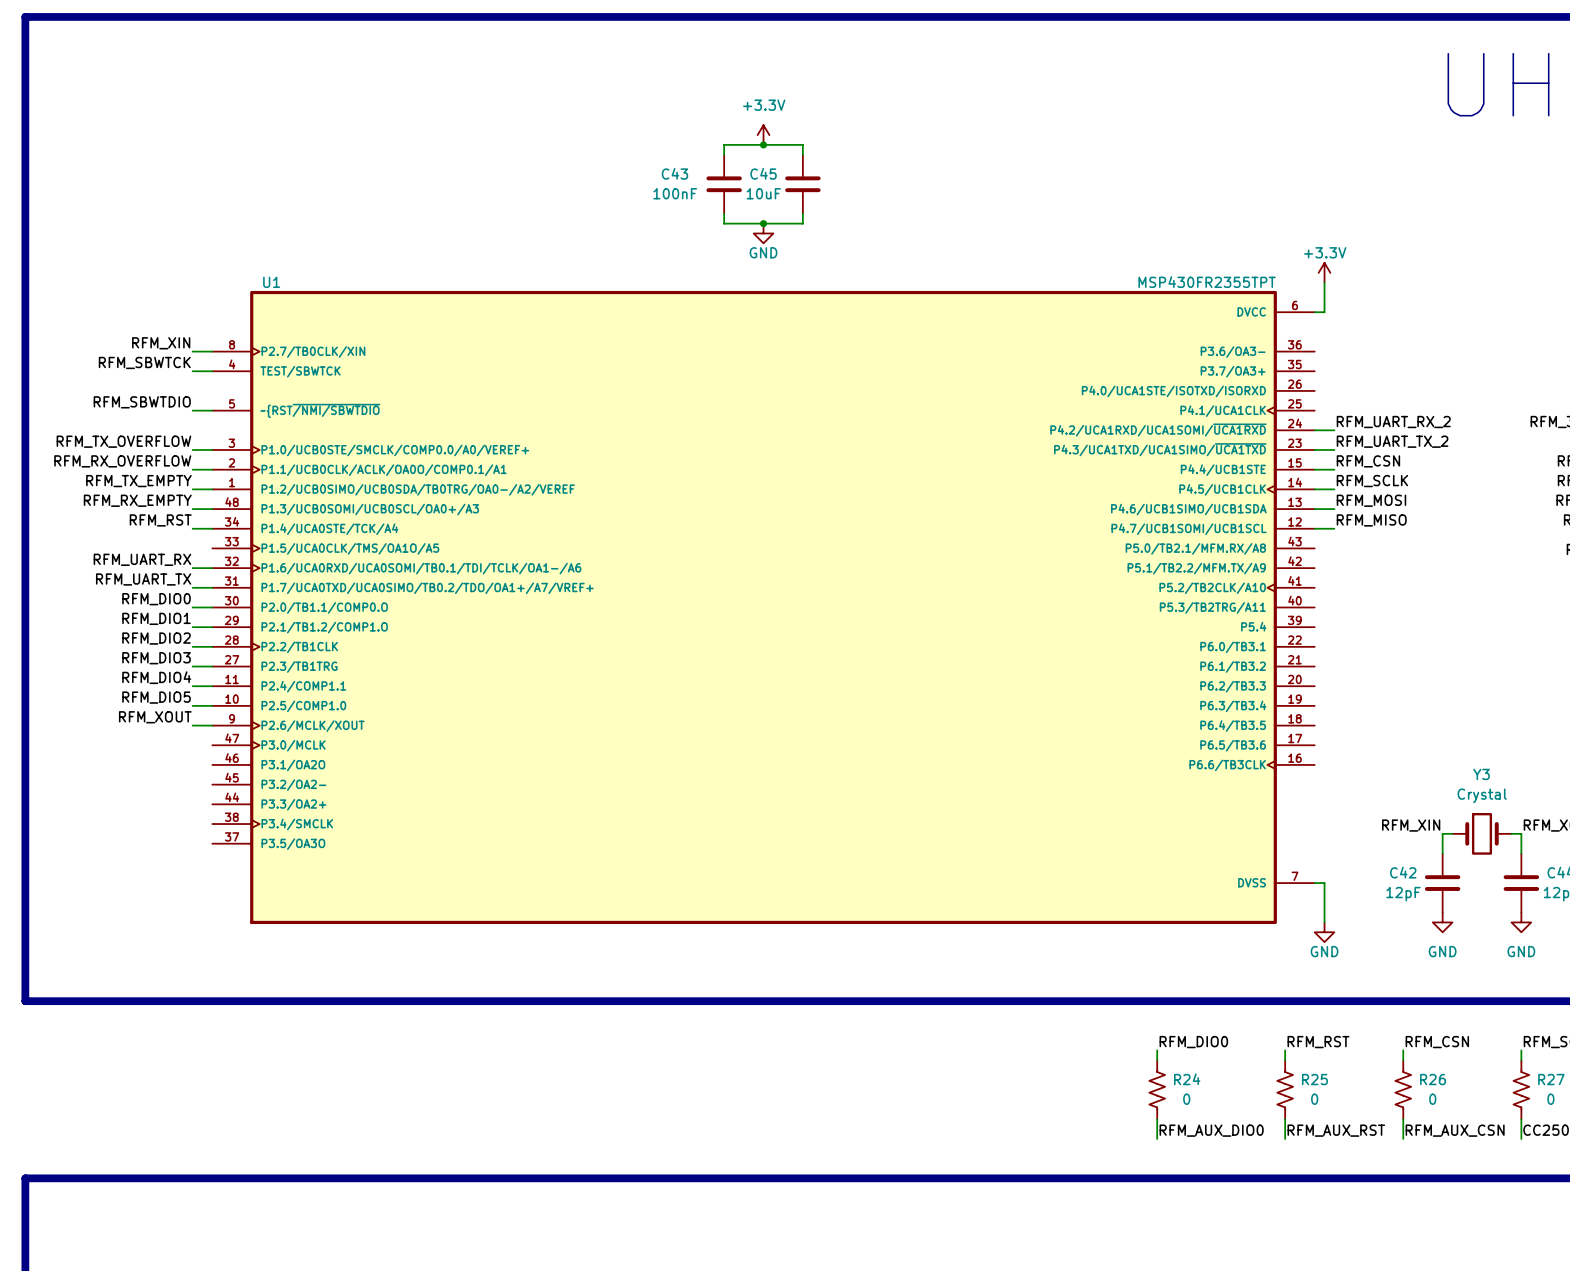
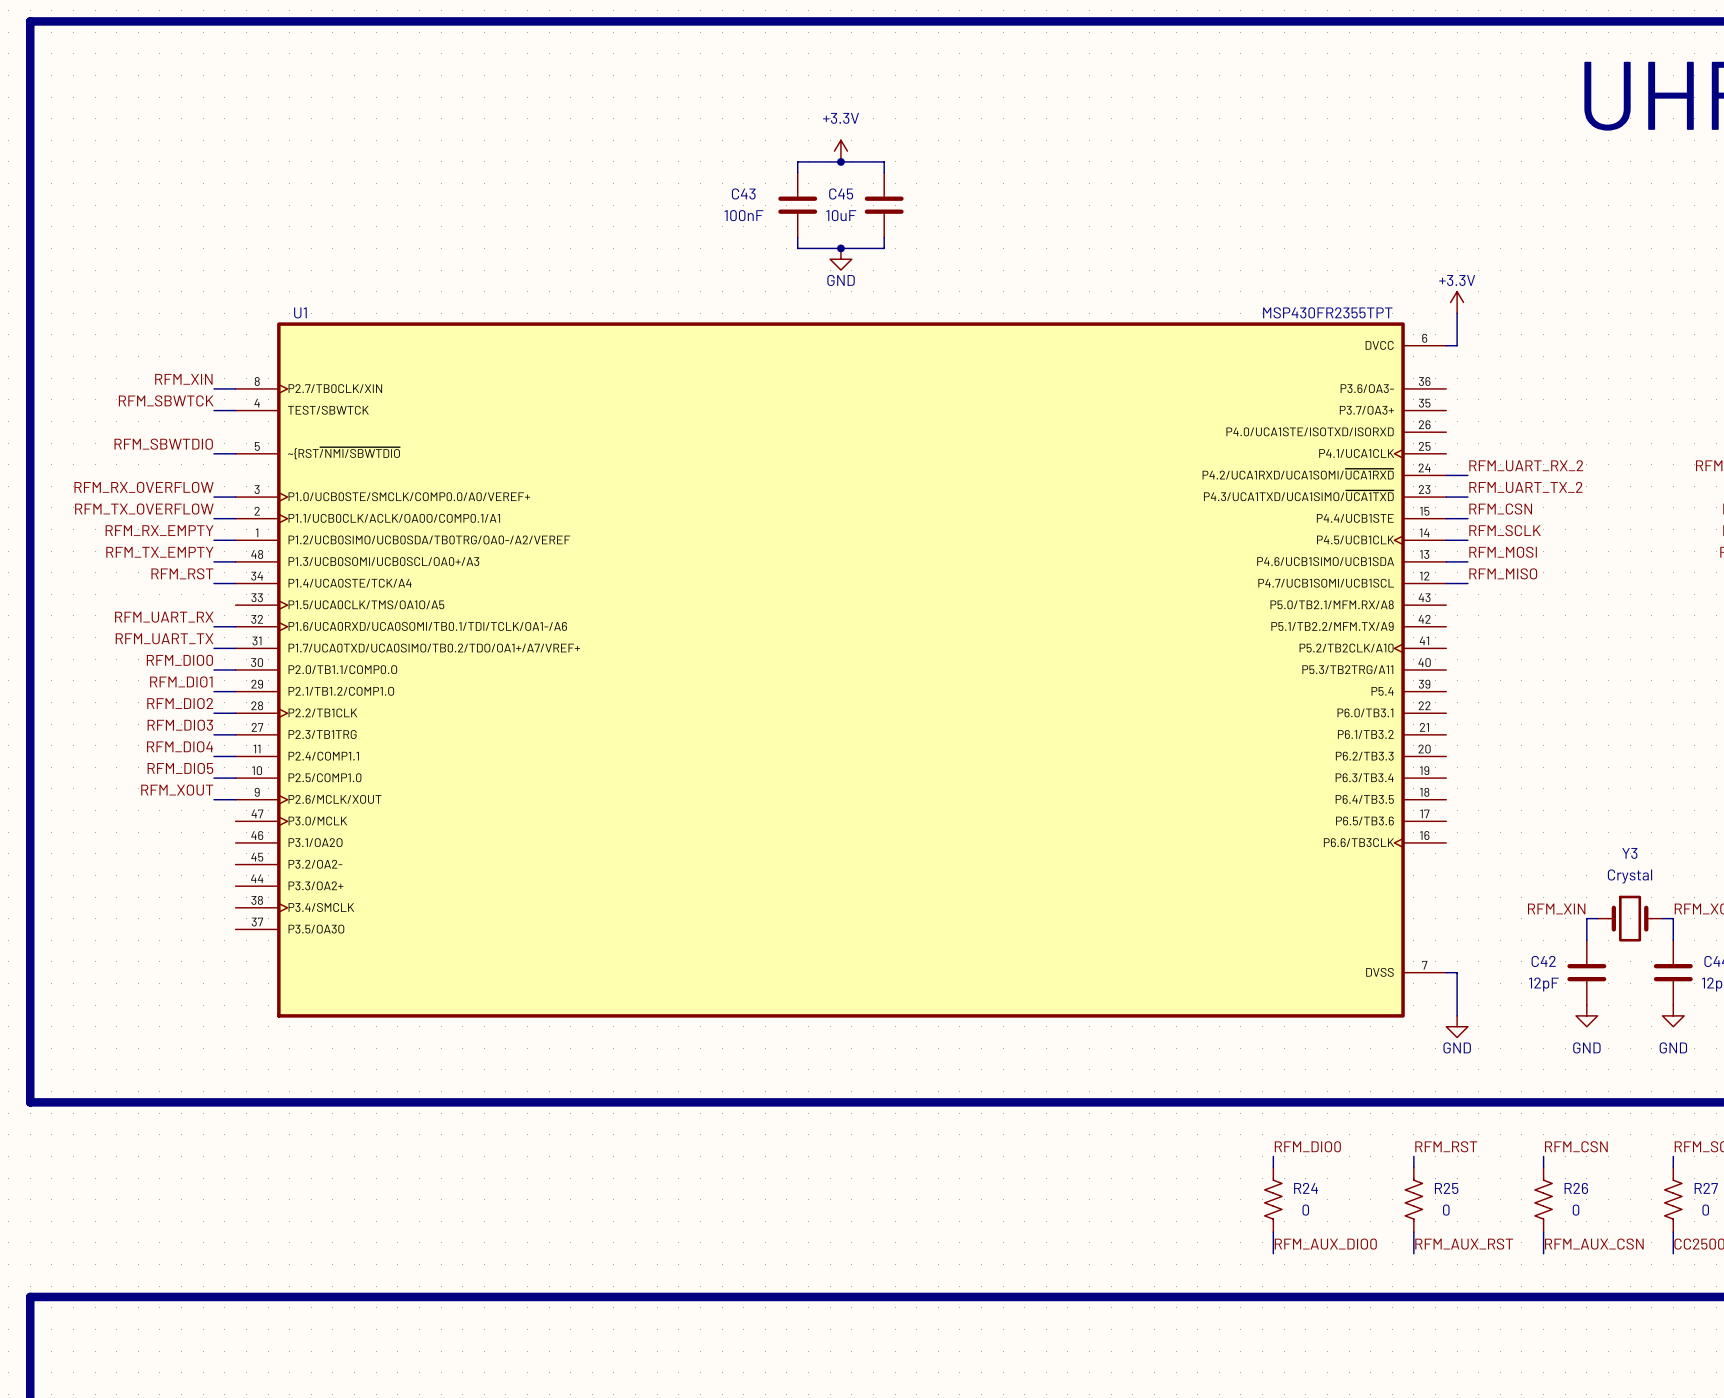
label: RFM_TX_OVERFLOW (123, 441) -> RFM_RX_OVERFLOW (144, 487)
label: RFM_RX_OVERFLOW (122, 461) -> RFM_TX_OVERFLOW (144, 509)
label: RFM_TX_EMPTY (138, 481) -> RFM_RX_EMPTY (159, 530)
label: RFM_RX_EMPTY (137, 500) -> RFM_TX_EMPTY (159, 552)

